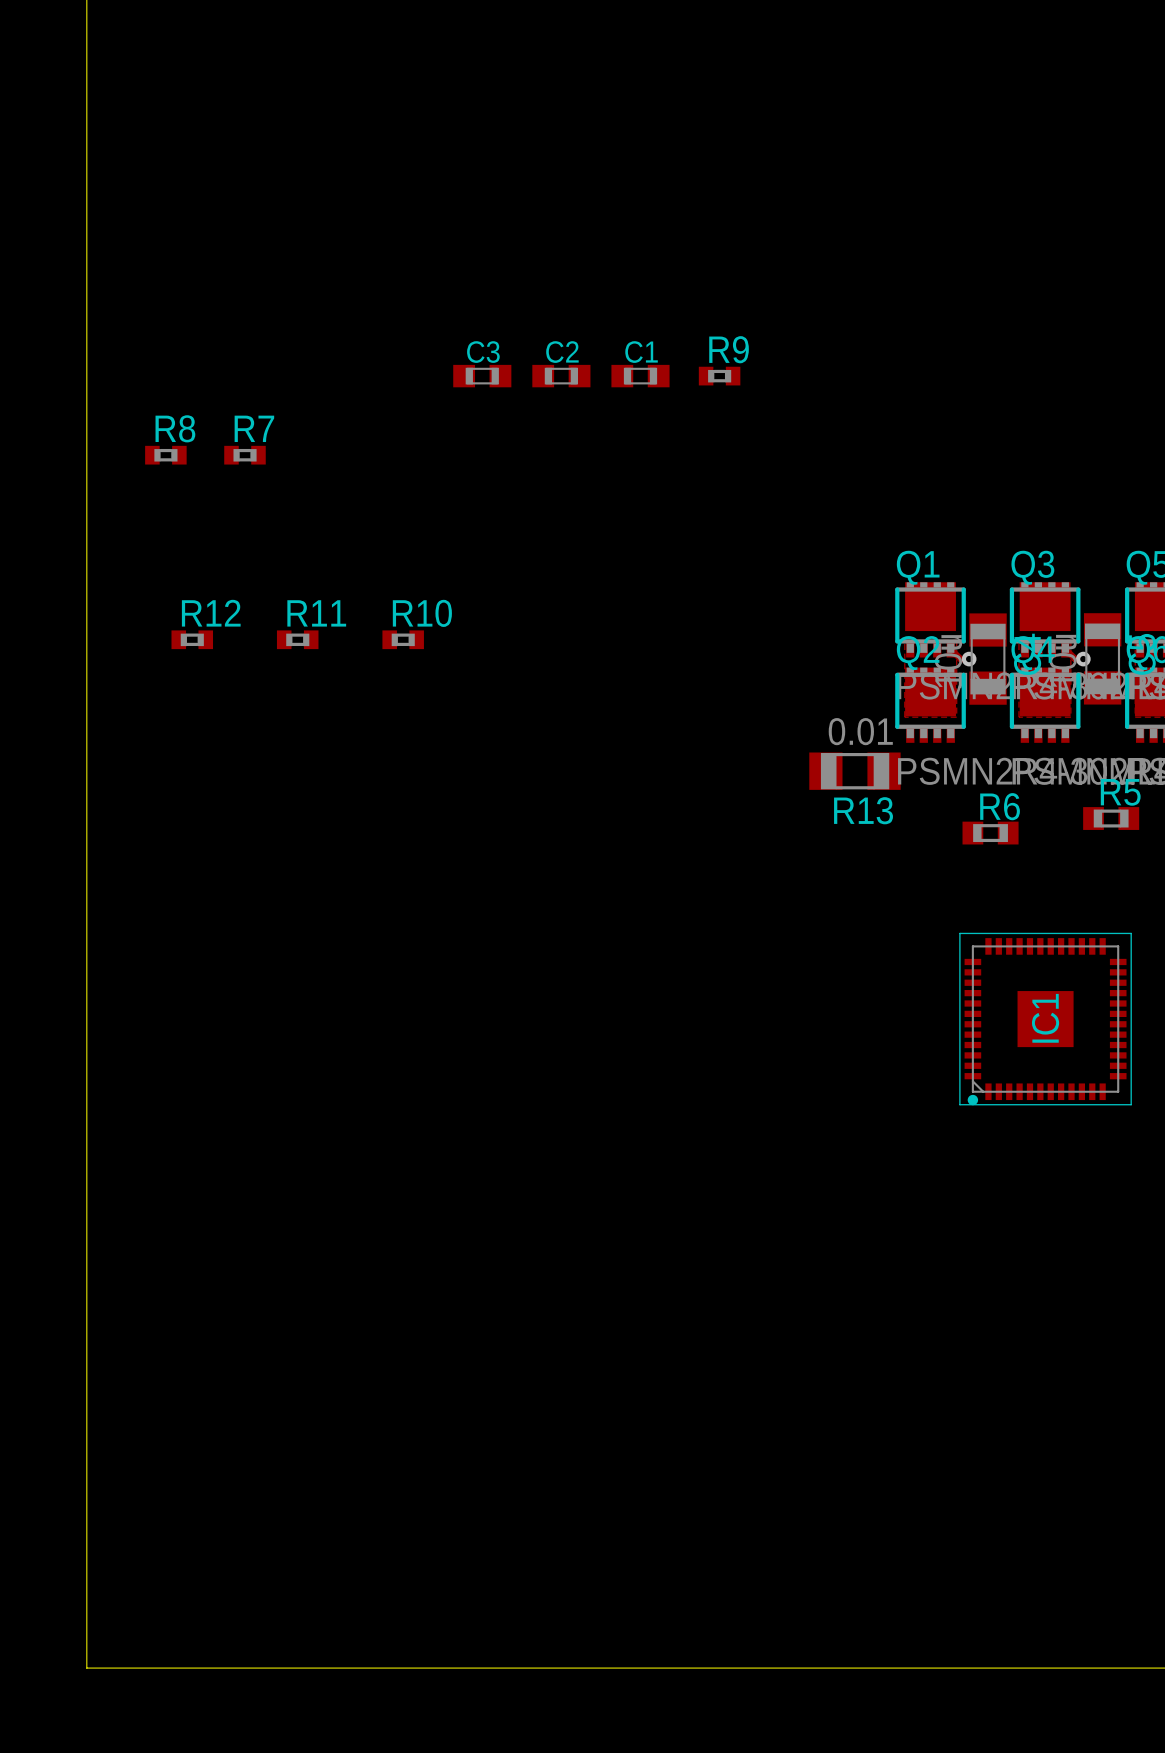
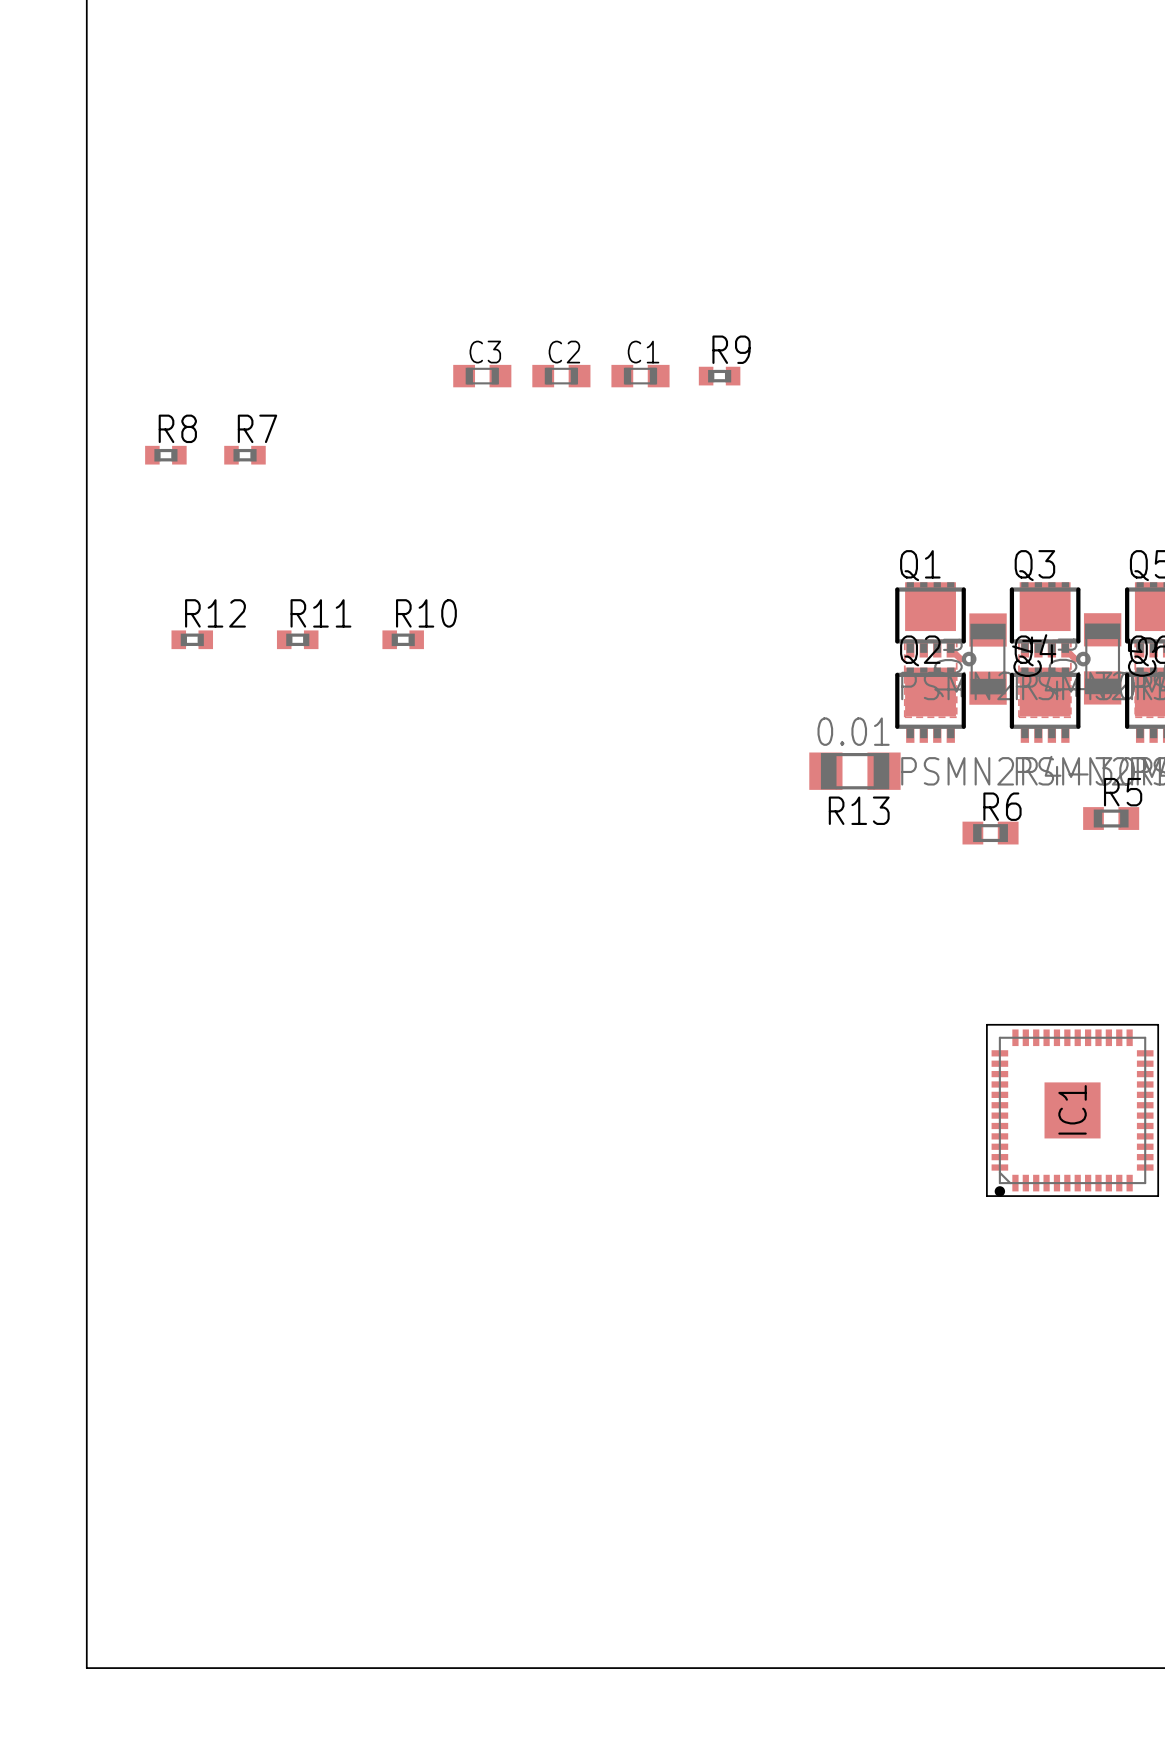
IC1 position: (1045, 1019) -> (1072, 1110)

